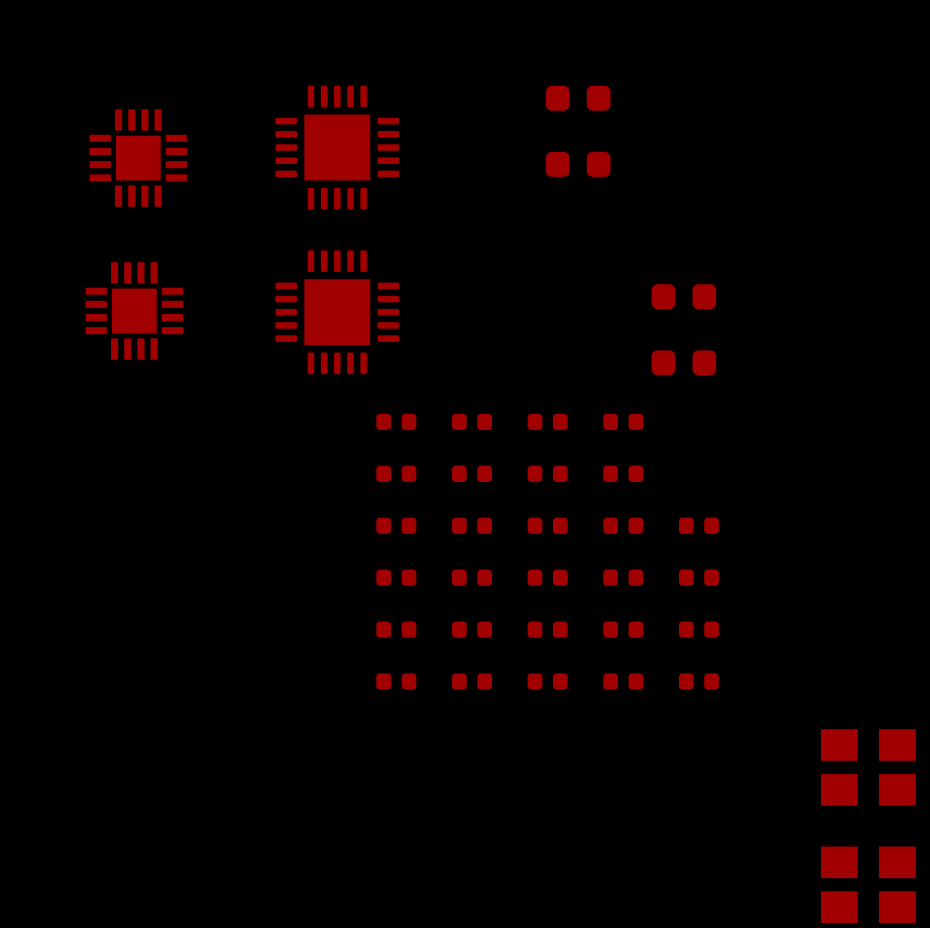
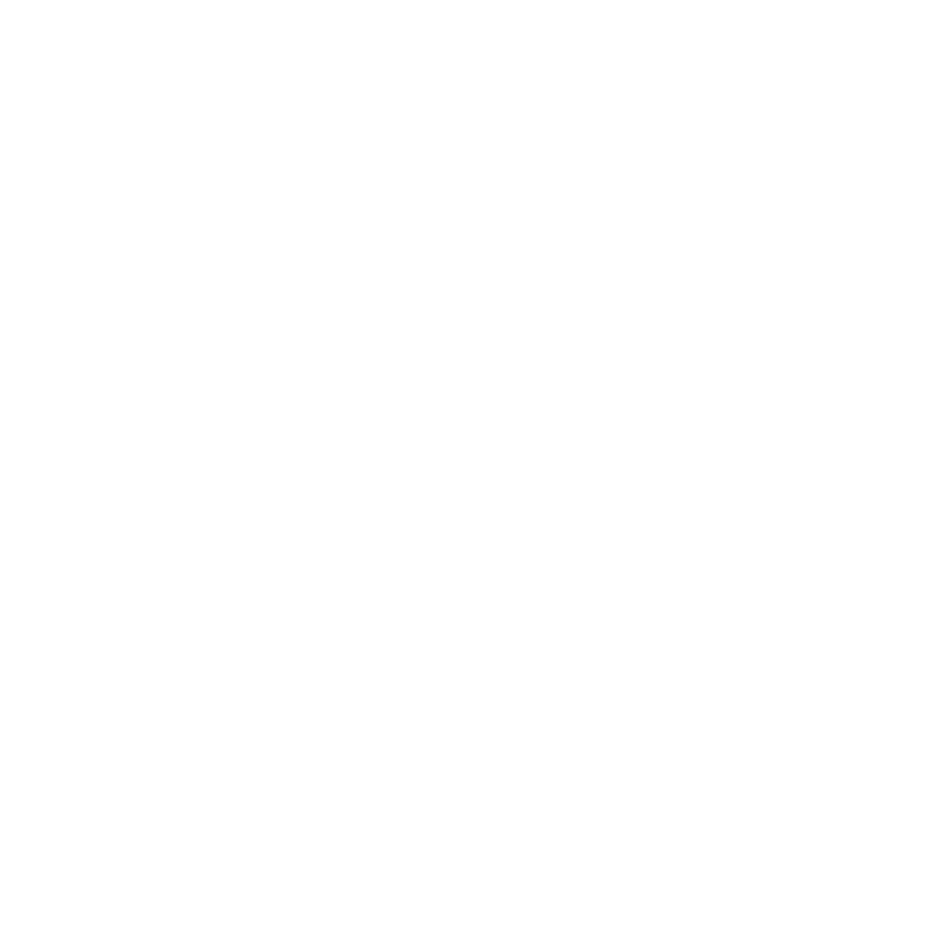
part: (578, 98) -> none
part: (337, 147) -> none
part: (138, 158) -> none
part: (578, 164) -> none
part: (683, 296) -> none
part: (134, 310) -> none
part: (337, 312) -> none
part: (683, 362) -> none
part: (396, 421) -> none
part: (471, 421) -> none
part: (547, 421) -> none
part: (623, 421) -> none
part: (396, 473) -> none
part: (471, 473) -> none
part: (547, 473) -> none
part: (623, 473) -> none
part: (396, 525) -> none
part: (471, 525) -> none
part: (547, 525) -> none
part: (623, 525) -> none
part: (698, 525) -> none
part: (396, 577) -> none
part: (471, 577) -> none
part: (547, 577) -> none
part: (623, 577) -> none
part: (698, 577) -> none
part: (396, 629) -> none
part: (471, 629) -> none
part: (547, 629) -> none
part: (623, 629) -> none
part: (698, 629) -> none
part: (396, 681) -> none
part: (471, 681) -> none
part: (547, 681) -> none
part: (623, 681) -> none
part: (698, 681) -> none
part: (868, 767) -> none
part: (868, 884) -> none

